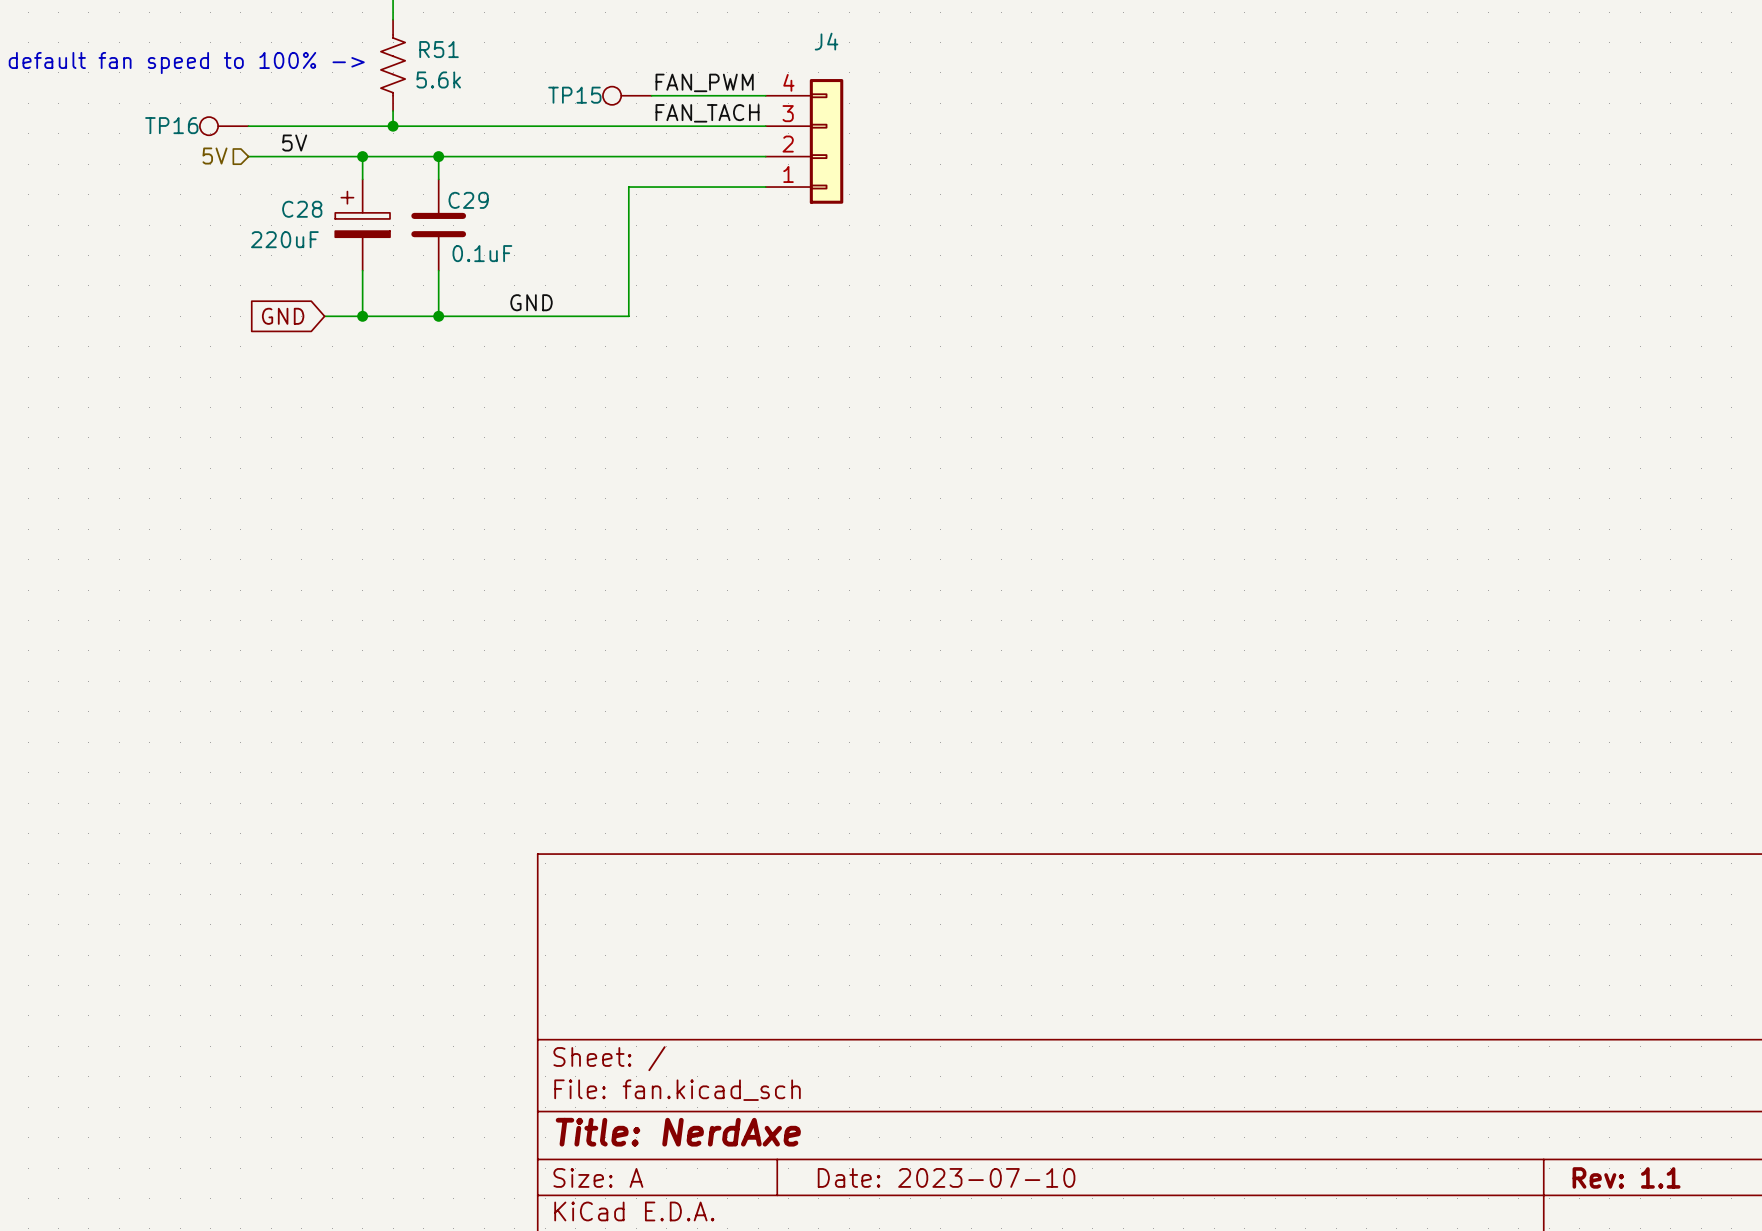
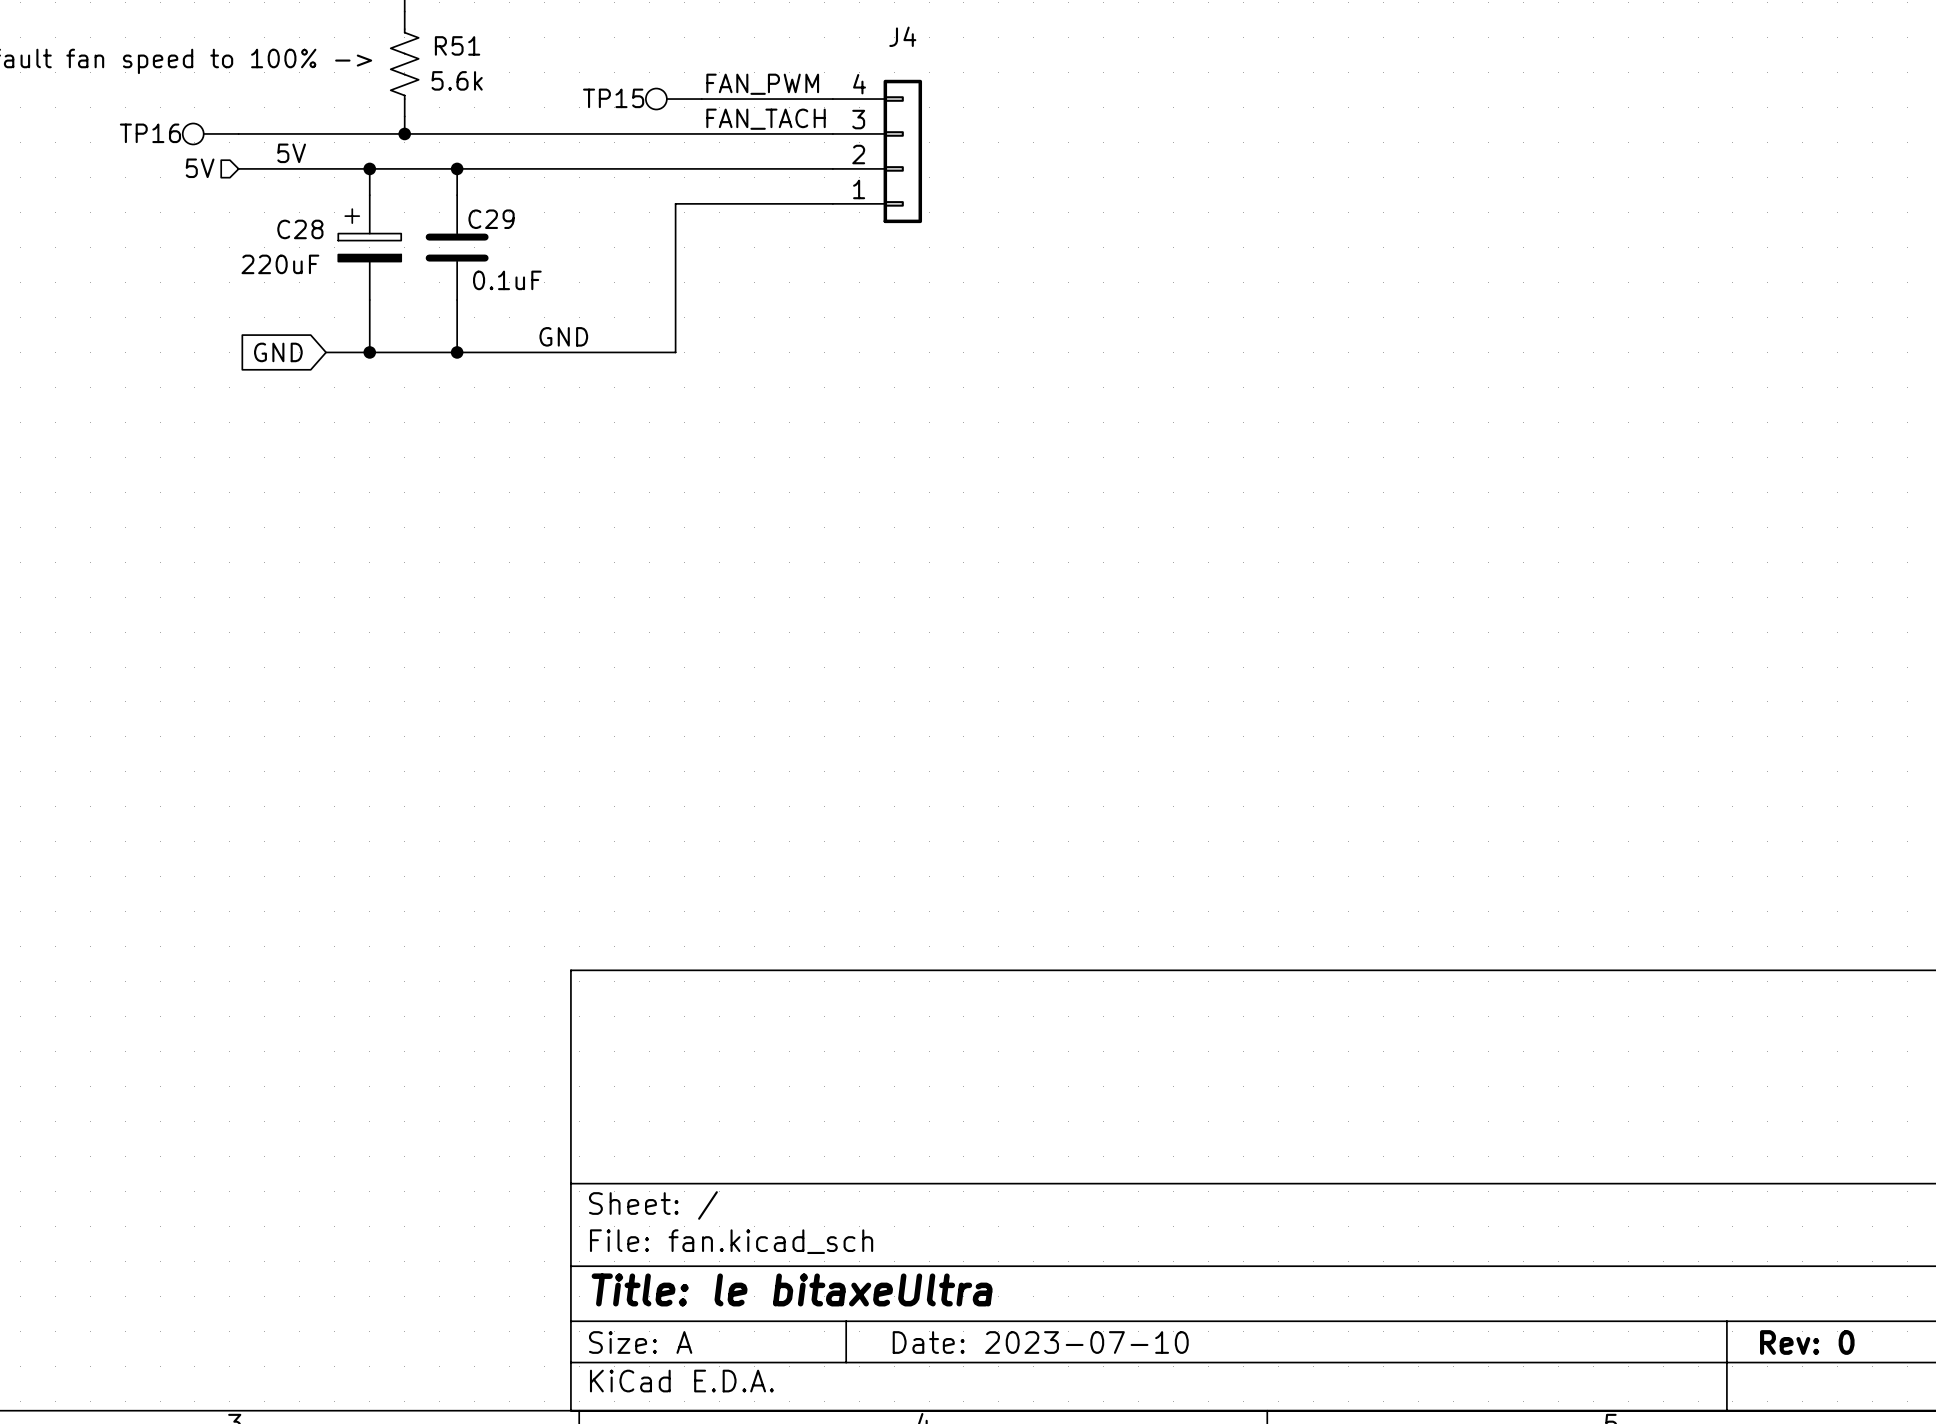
title block: Title: NerdAxe (678, 1132) -> Title: le bitaxeUltra (792, 1289)
title block: Rev: 1.1 (1626, 1177) -> Rev: 0 (1807, 1342)

